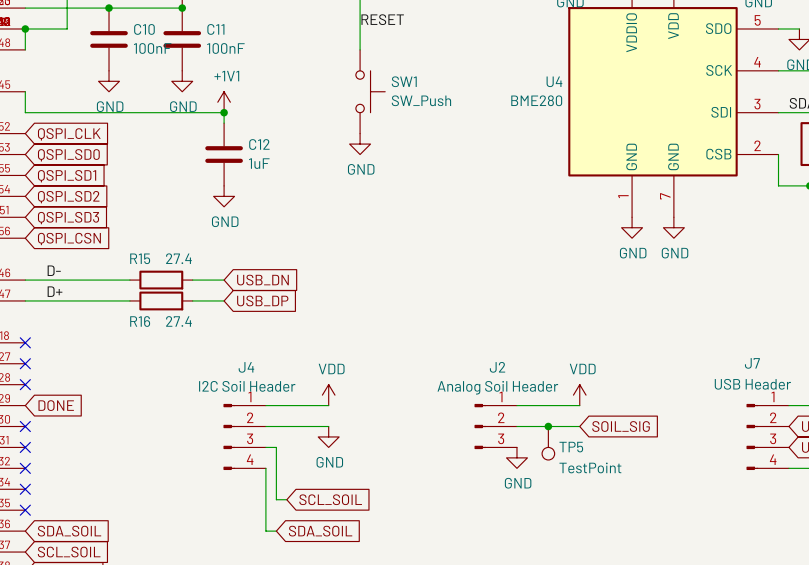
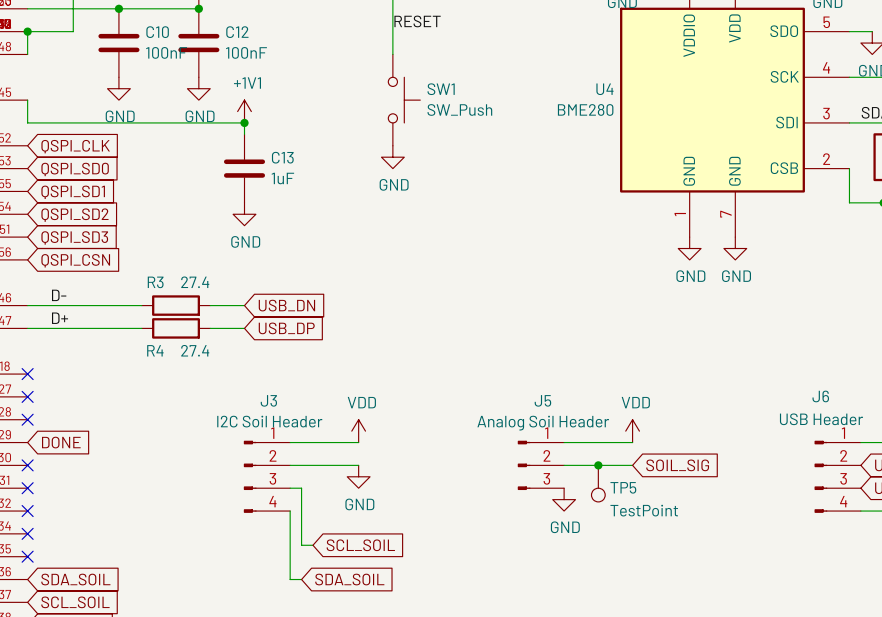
C11 name: C11 (215, 29) -> C12 (237, 32)
C12 name: C12 (259, 144) -> C13 (282, 157)
R15 name: R15 (140, 258) -> R3 (155, 282)
R16 name: R16 (140, 321) -> R4 (155, 350)
J7 name: J7 (752, 363) -> J6 (820, 396)
J4 name: J4 (246, 367) -> J3 (268, 400)
J2 name: J2 (497, 367) -> J5 (542, 400)

